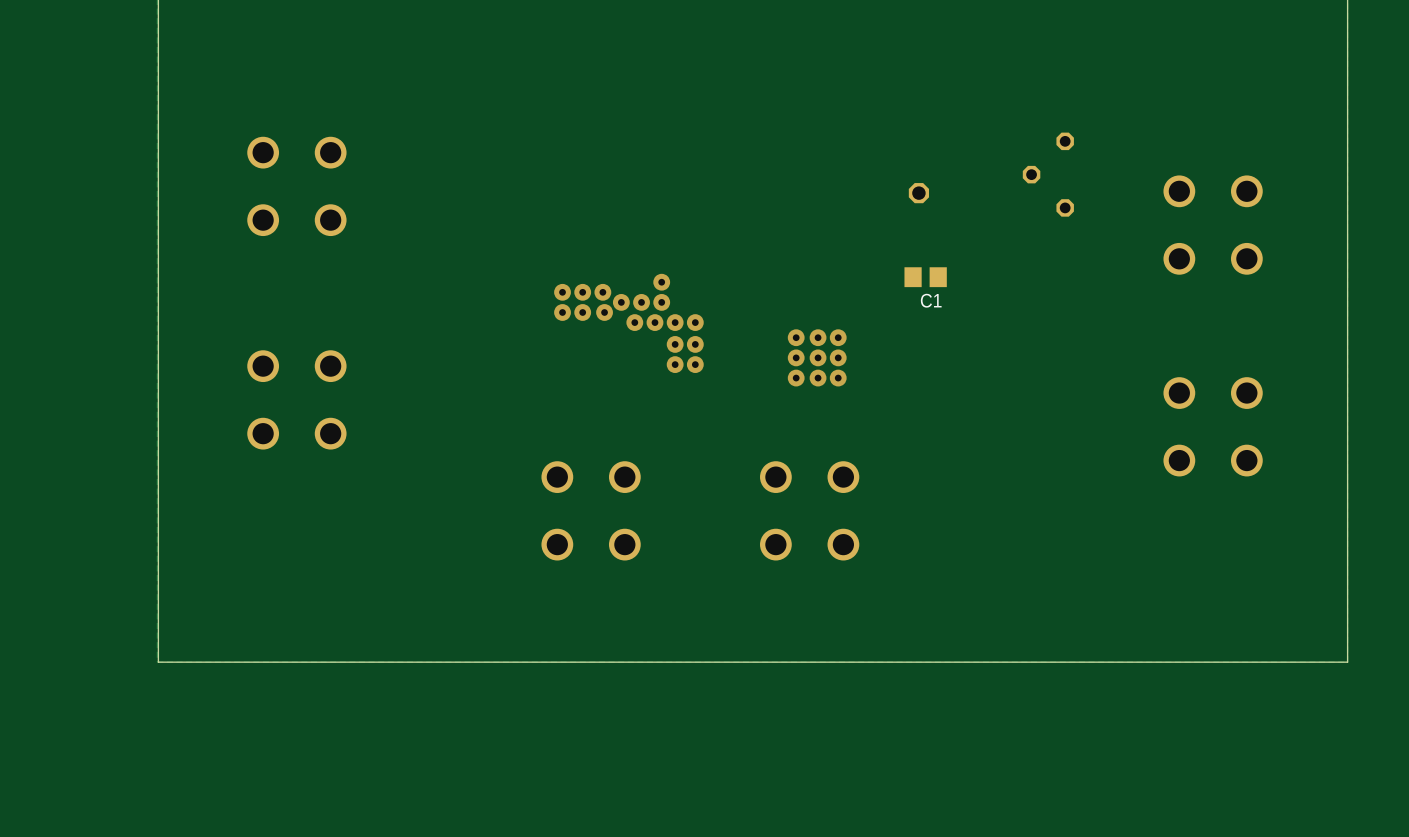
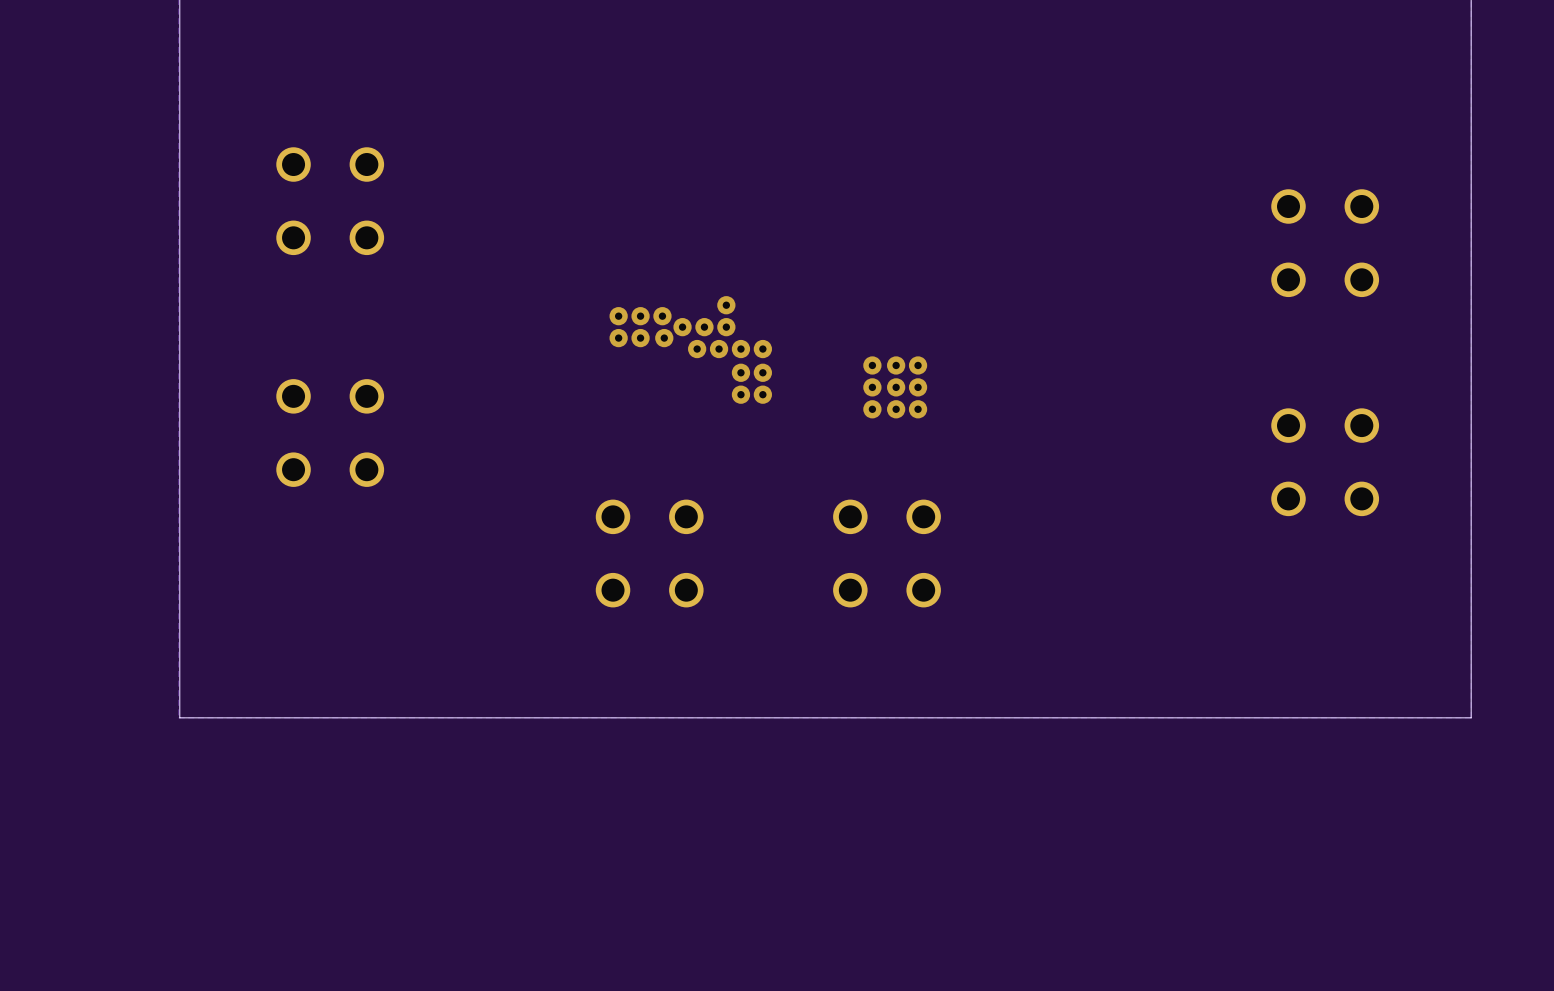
part: (1048, 174) -> none
part: (918, 193) -> none
C1: (925, 277) -> none

